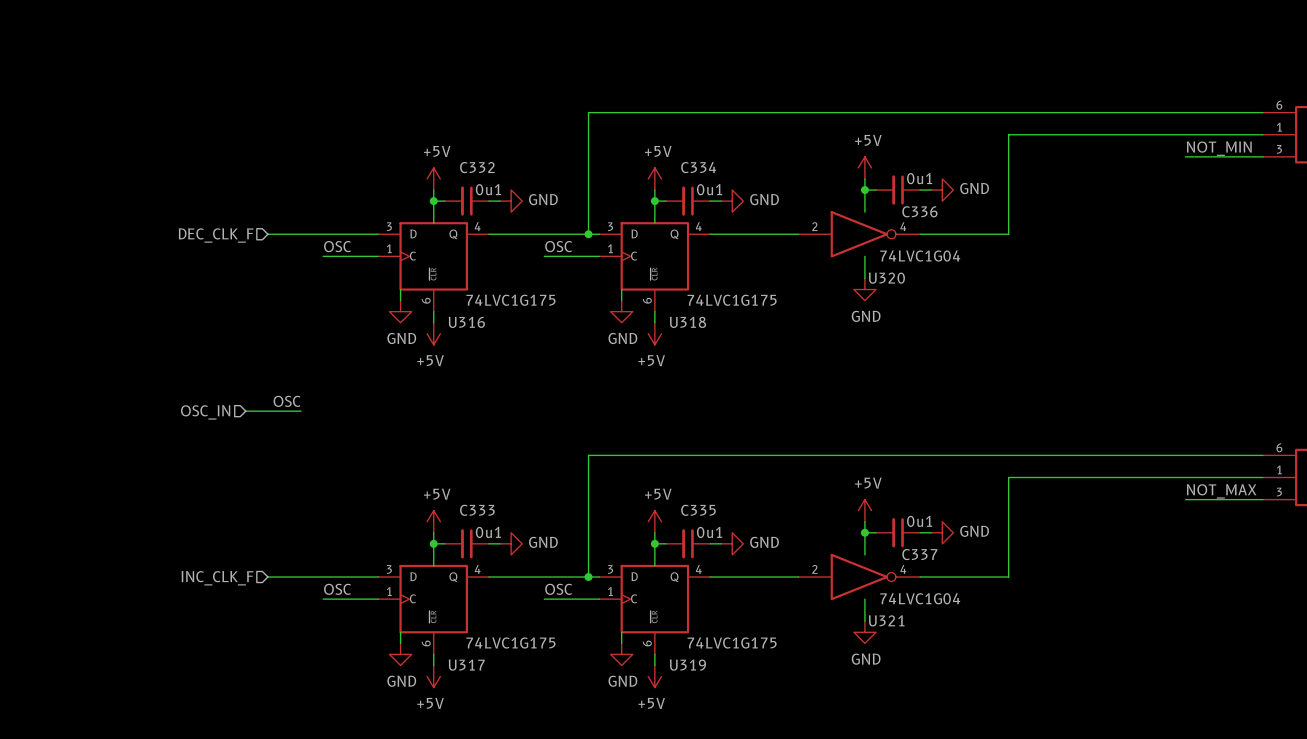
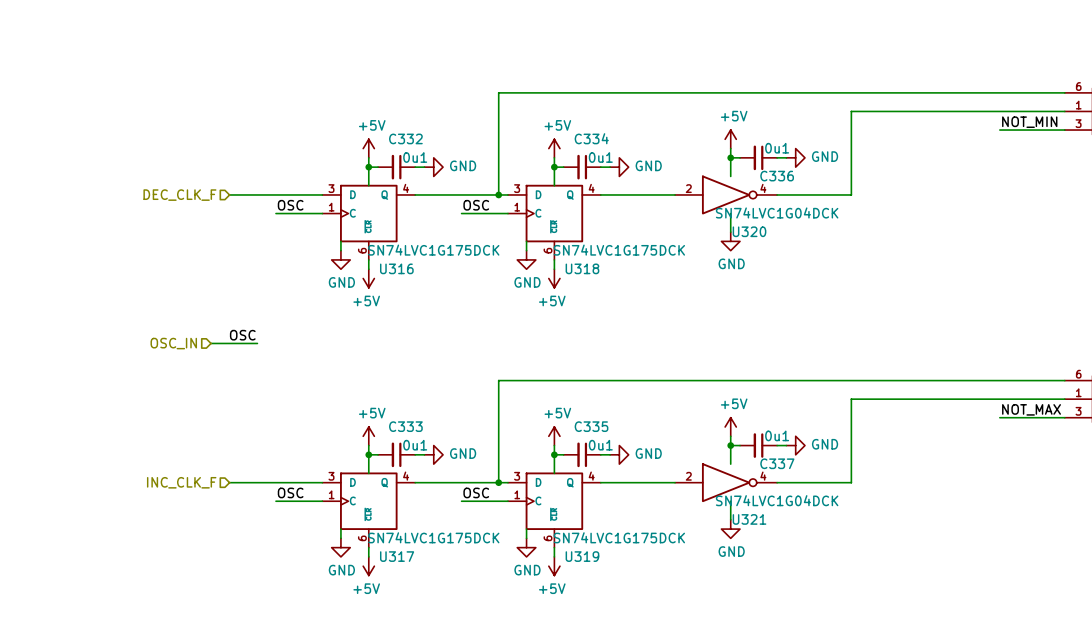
U320 value: 74LVC1G04 (920, 256) -> SN74LVC1G04DCK (777, 212)
U316 value: 74LVC1G175 (510, 300) -> SN74LVC1G175DCK (433, 250)
U318 value: 74LVC1G175 (732, 300) -> SN74LVC1G175DCK (619, 250)
U321 value: 74LVC1G04 (920, 598) -> SN74LVC1G04DCK (777, 500)
U317 value: 74LVC1G175 (510, 643) -> SN74LVC1G175DCK (433, 537)
U319 value: 74LVC1G175 (732, 643) -> SN74LVC1G175DCK (619, 537)

